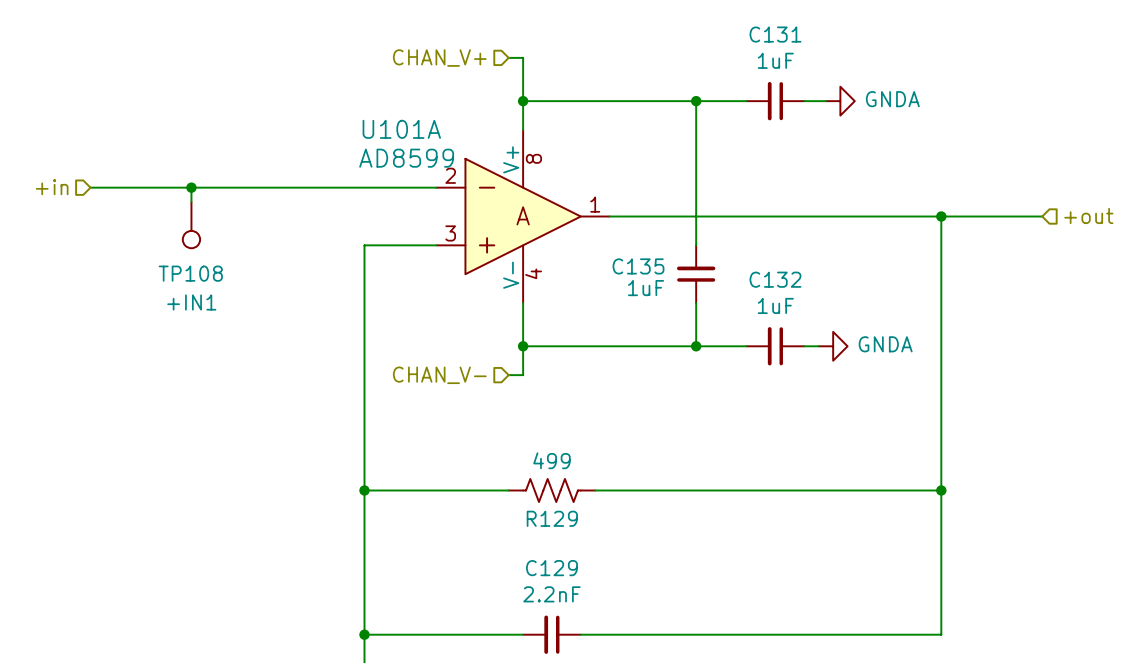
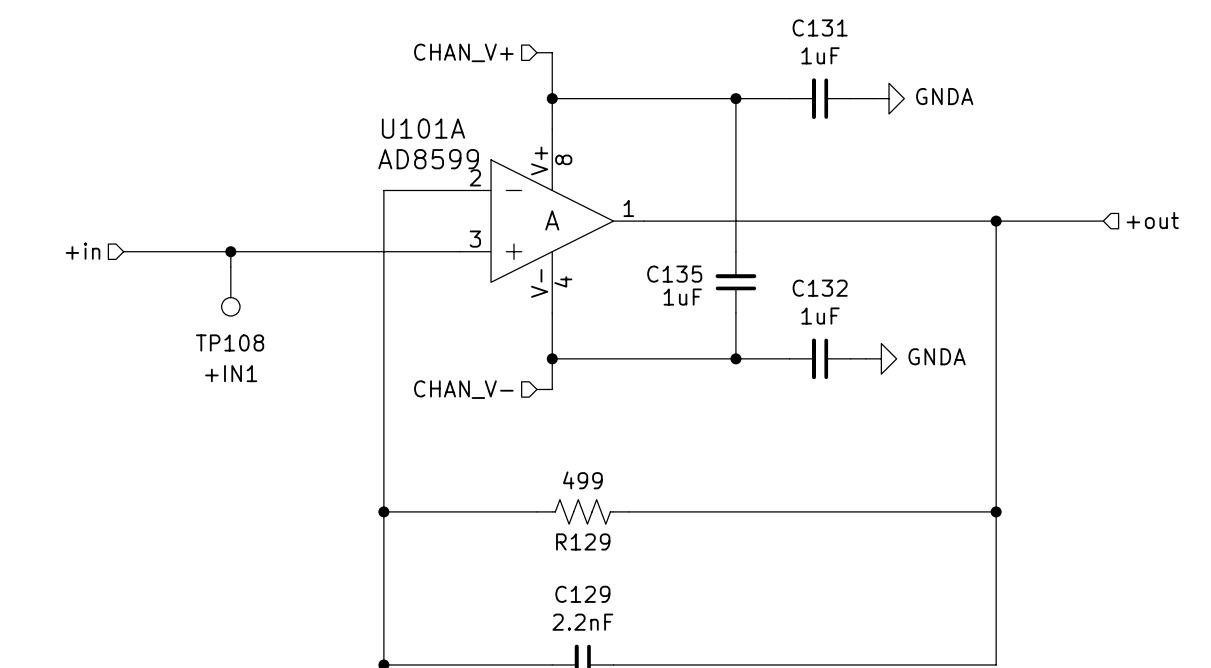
hierarchical label position: +in (52, 187) -> +in (82, 251)
wire: (90, 187) (364, 187) -> (123, 251) (383, 251) (383, 190)
wire: (191, 187) (191, 202) -> (230, 251) (230, 267)
junction position: (191, 187) -> (230, 251)
TP108 position: (191, 225) -> (230, 291)

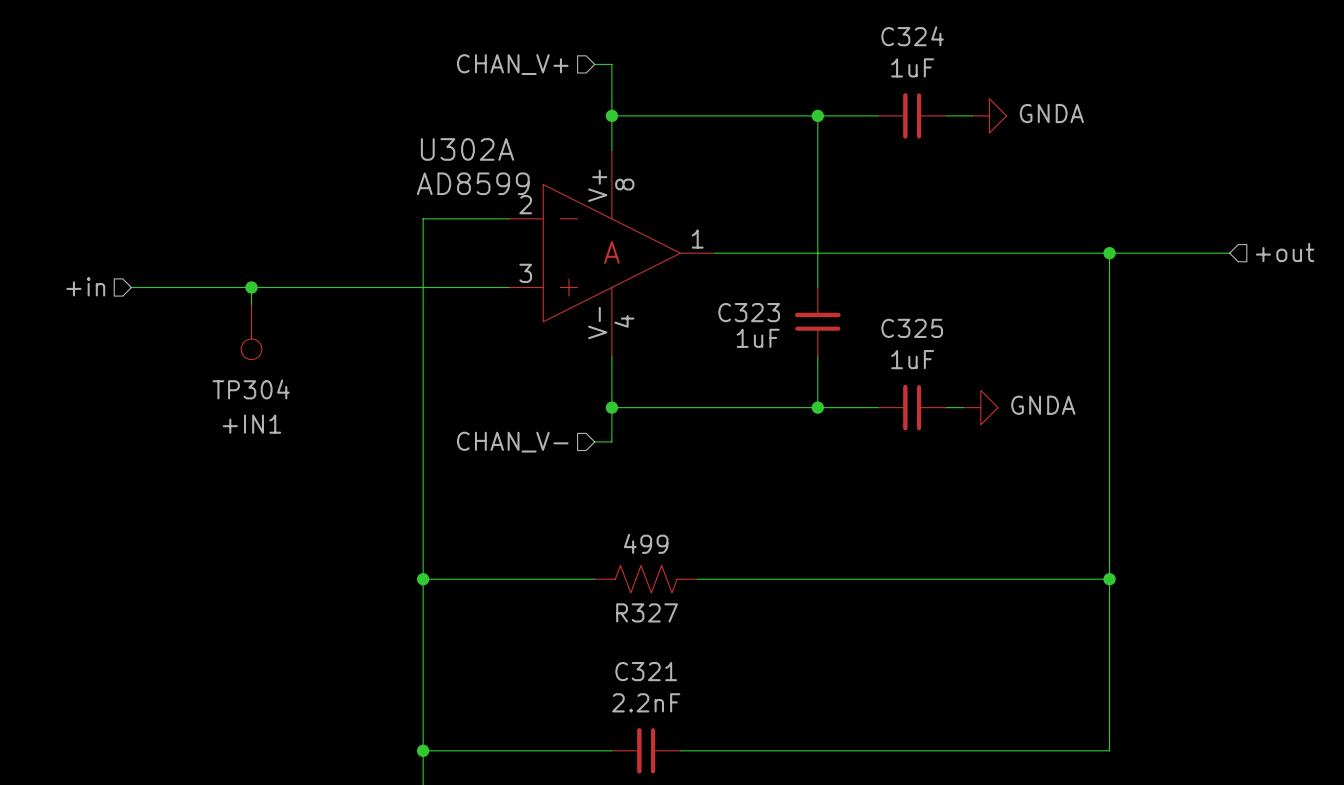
C131 name: C131 (820, 27) -> C324 (912, 36)
U101A name: U101A (423, 128) -> U302A (467, 149)
C135 name: C135 (674, 274) -> C323 (749, 312)
C132 name: C132 (820, 288) -> C325 (912, 328)
TP108 name: TP108 (230, 342) -> TP304 (251, 389)
R129 name: R129 (583, 541) -> R327 (647, 612)
C129 name: C129 (582, 594) -> C321 (646, 671)

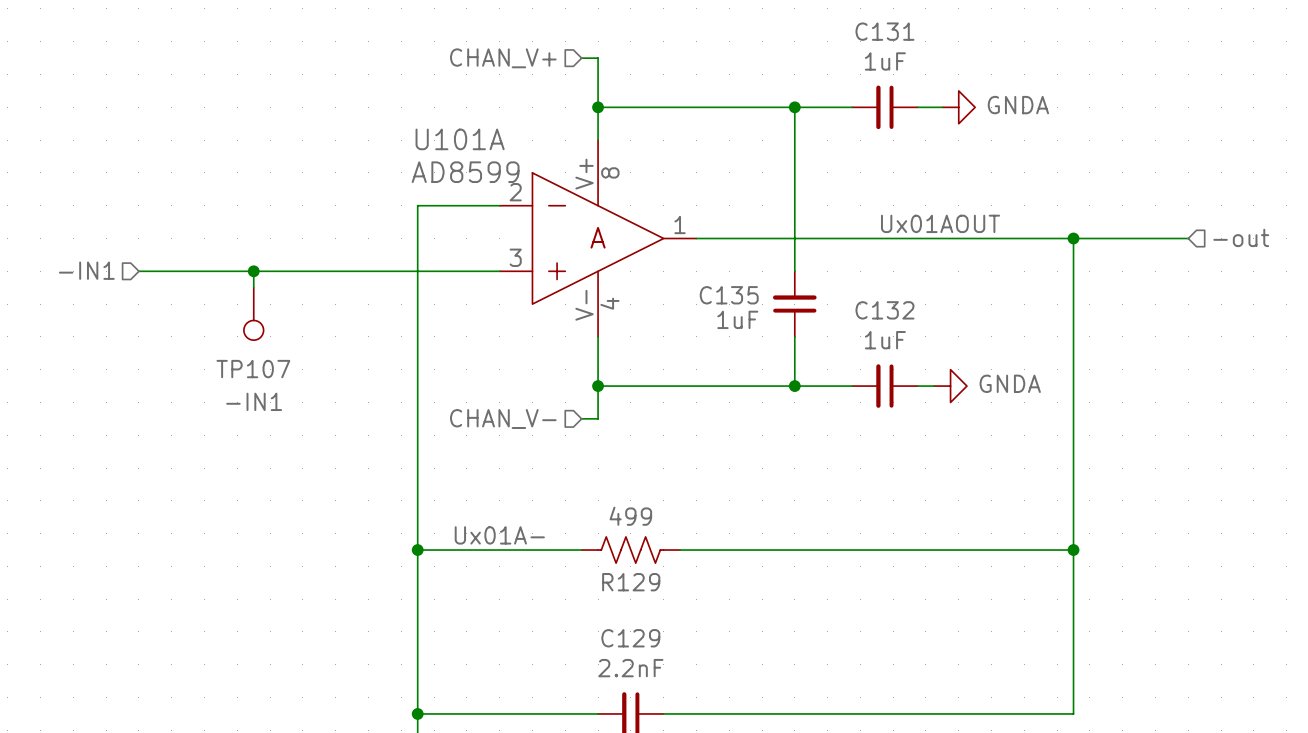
C324 name: C324 (912, 36) -> C131 (884, 31)
U302A name: U302A (467, 149) -> U101A (460, 139)
label: none -> Ux01AOUT (940, 223)
hierarchical label: +out (1285, 252) -> -out (1241, 237)
hierarchical label: +in (85, 286) -> -IN1 (86, 270)
C323 name: C323 (749, 312) -> C135 (729, 295)
C325 name: C325 (912, 328) -> C132 (884, 310)
TP304 name: TP304 (251, 389) -> TP107 (253, 369)
TP304 value: +IN1 (251, 424) -> -IN1 (254, 401)
label: none -> Ux01A- (499, 535)
R327 name: R327 (647, 612) -> R129 (631, 582)
C321 name: C321 (646, 671) -> C129 (630, 638)

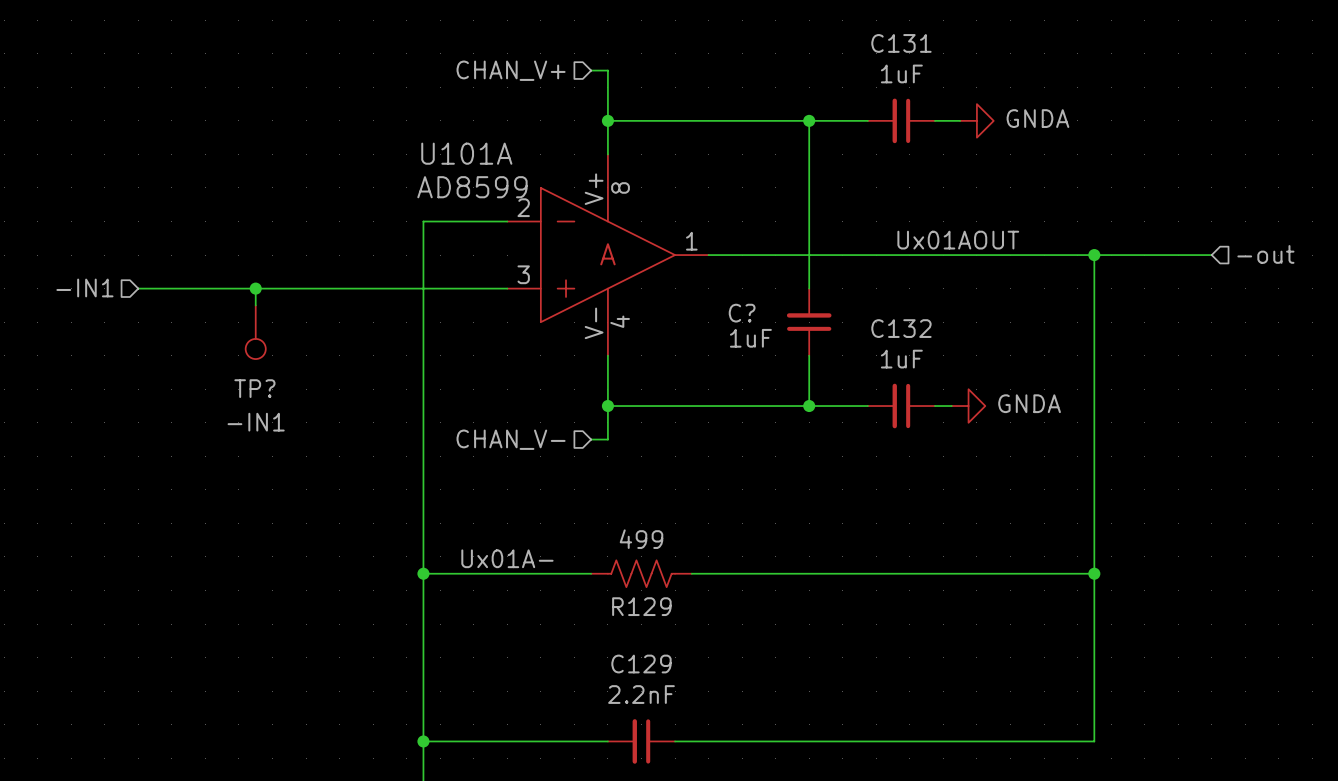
C135 name: C135 (729, 295) -> C? (742, 313)
TP107 name: TP107 (253, 369) -> TP? (254, 388)

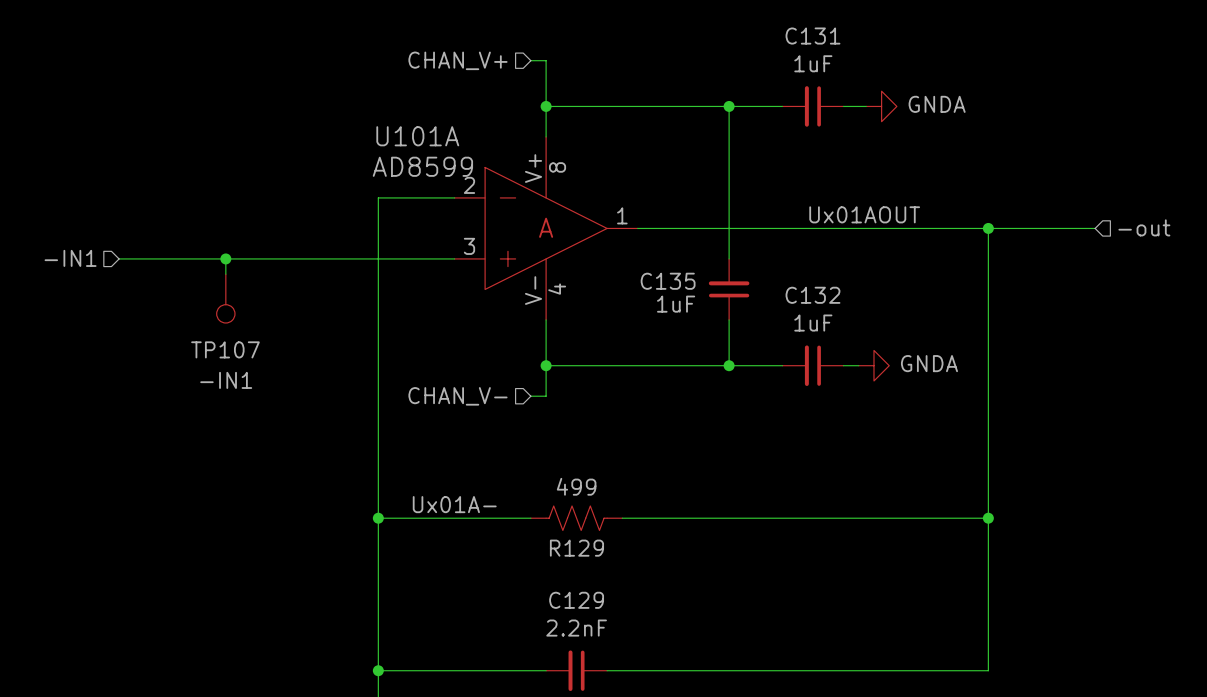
C? name: C? (742, 313) -> C135 (668, 281)
TP? name: TP? (254, 388) -> TP107 (225, 349)

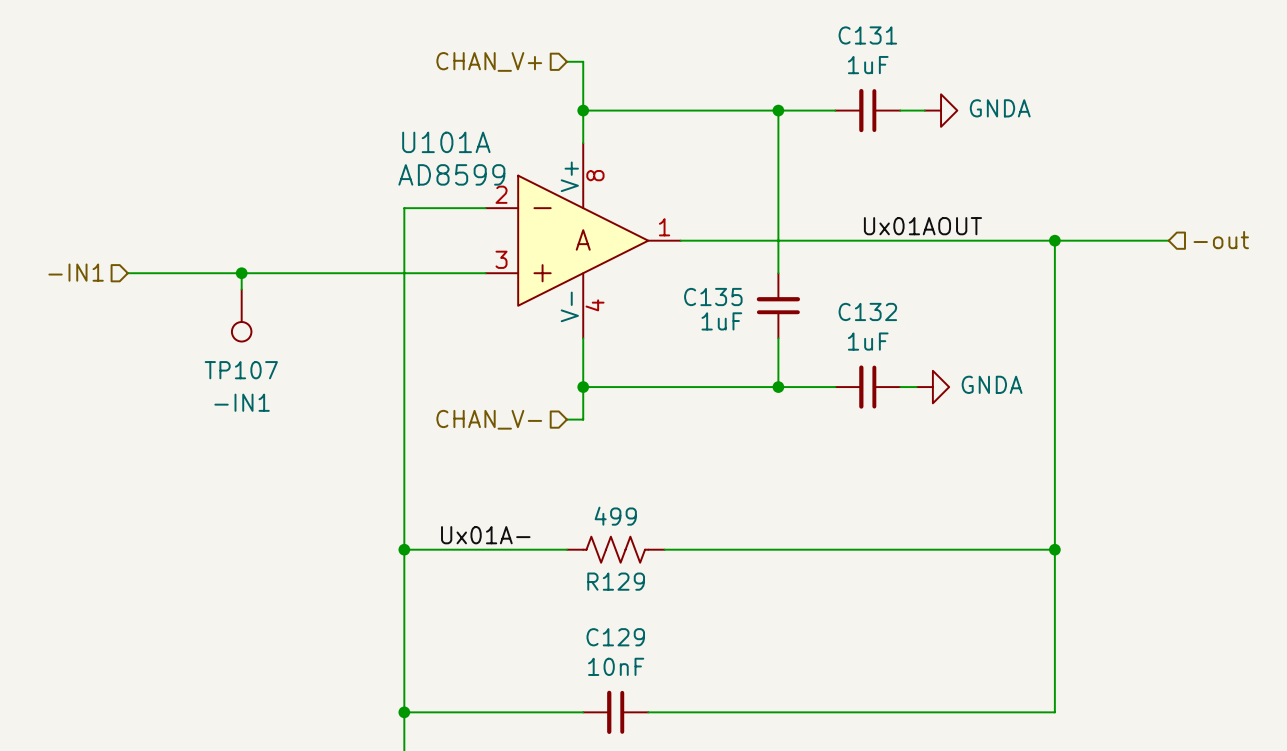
C129 value: 2.2nF (576, 628) -> 10nF (616, 666)

